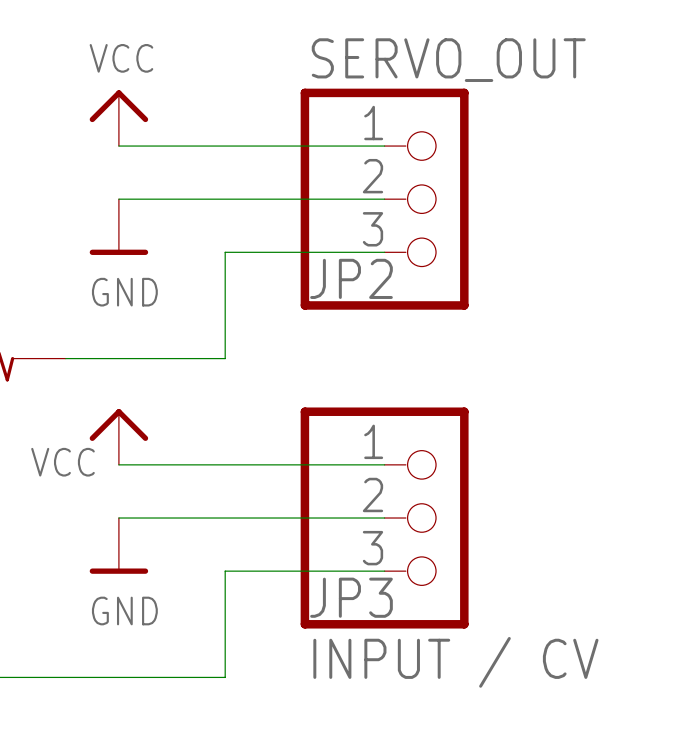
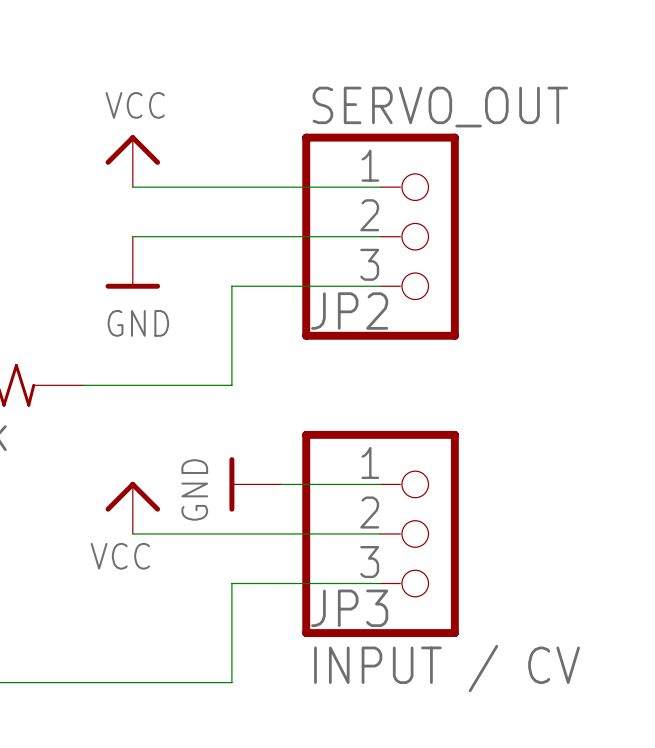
power symbol position: VCC (118, 436) -> VCC (132, 507)
power symbol text position: VCC (63, 462) -> VCC (120, 556)
wire: (118, 464) (278, 464) -> none
power symbol position: GND (118, 545) -> GND (255, 484)
power symbol rotation: 0° (118, 571) -> 90° clockwise (231, 484)

